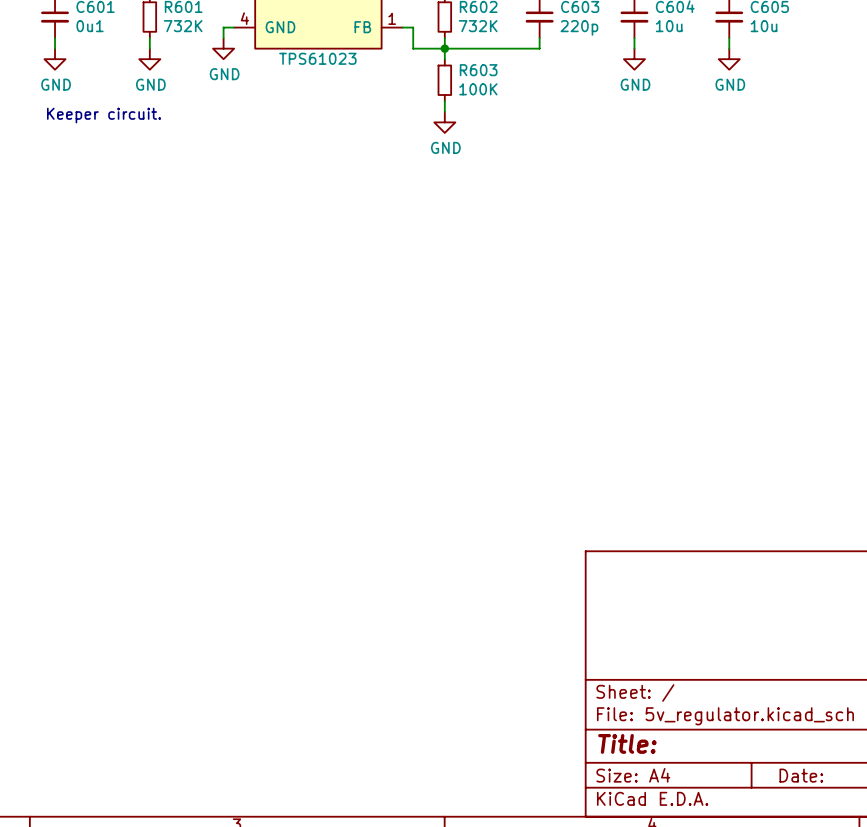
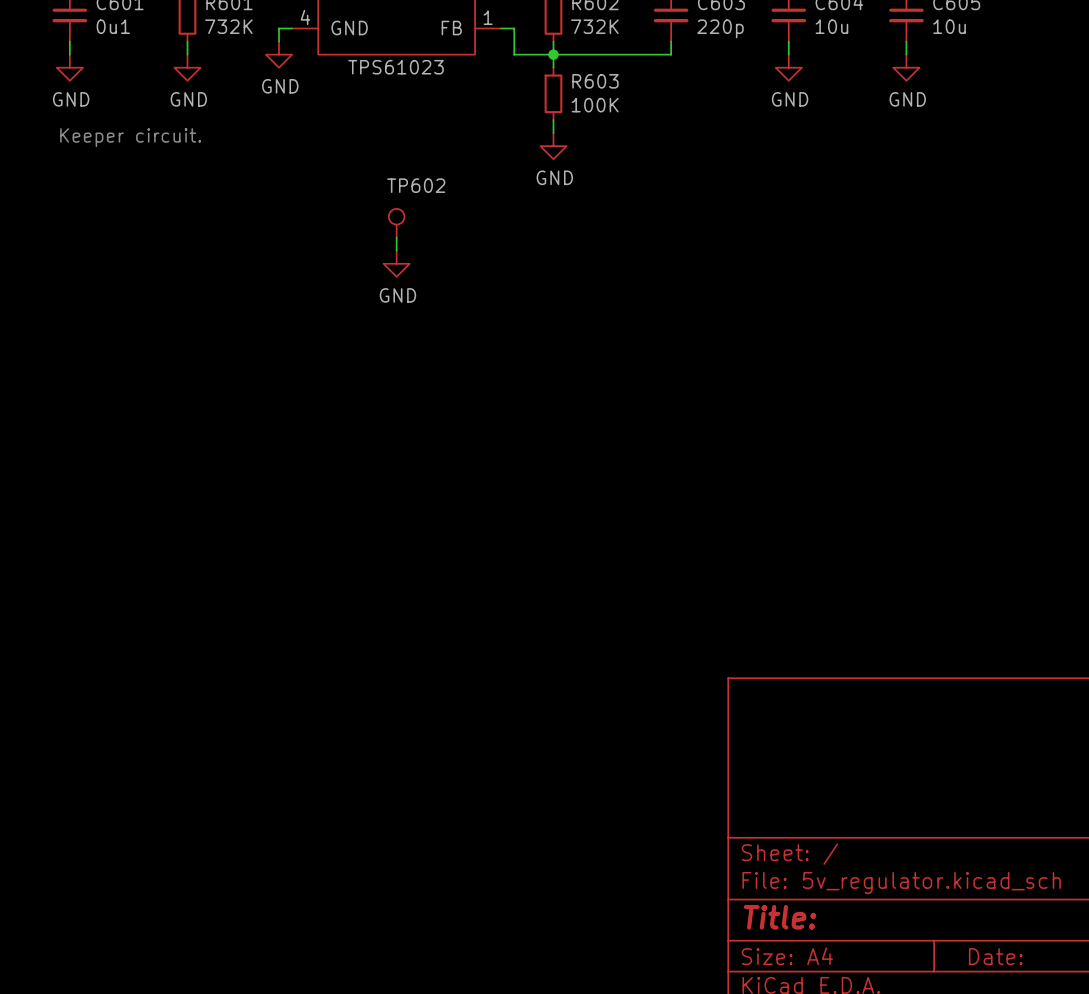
TP602: none -> (396, 223)
wire: none -> (396, 237) (396, 250)
power symbol: none -> GND (396, 263)

